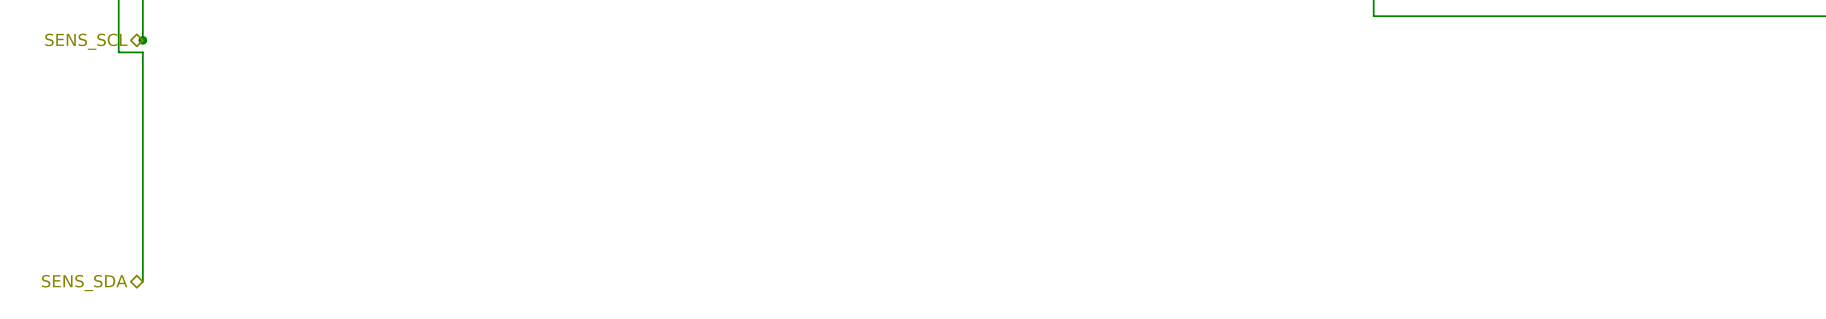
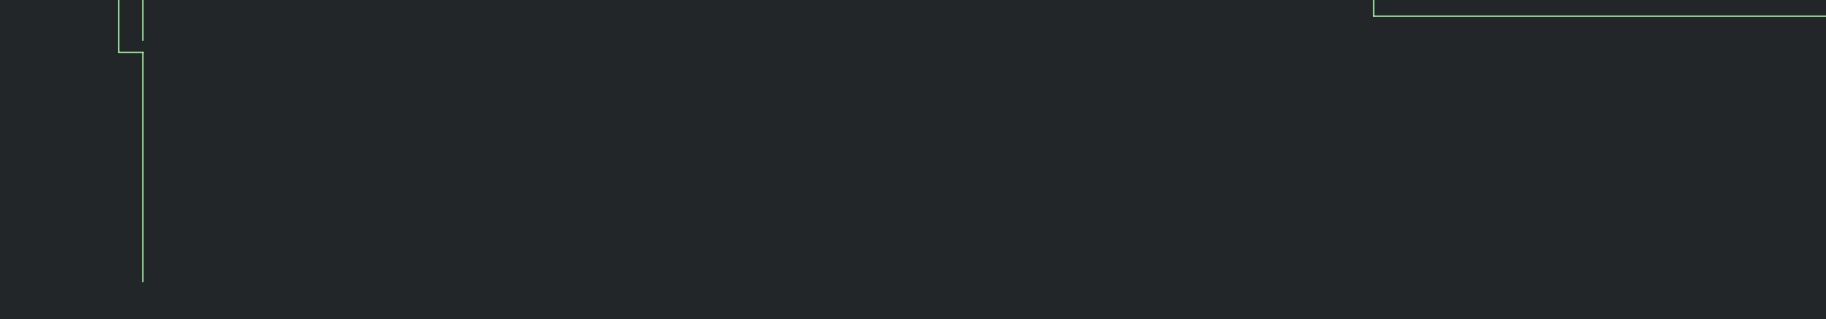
junction: (142, 40) -> none
hierarchical label: SENS_SCL (86, 41) -> none
hierarchical label: SENS_SDA (84, 283) -> none

